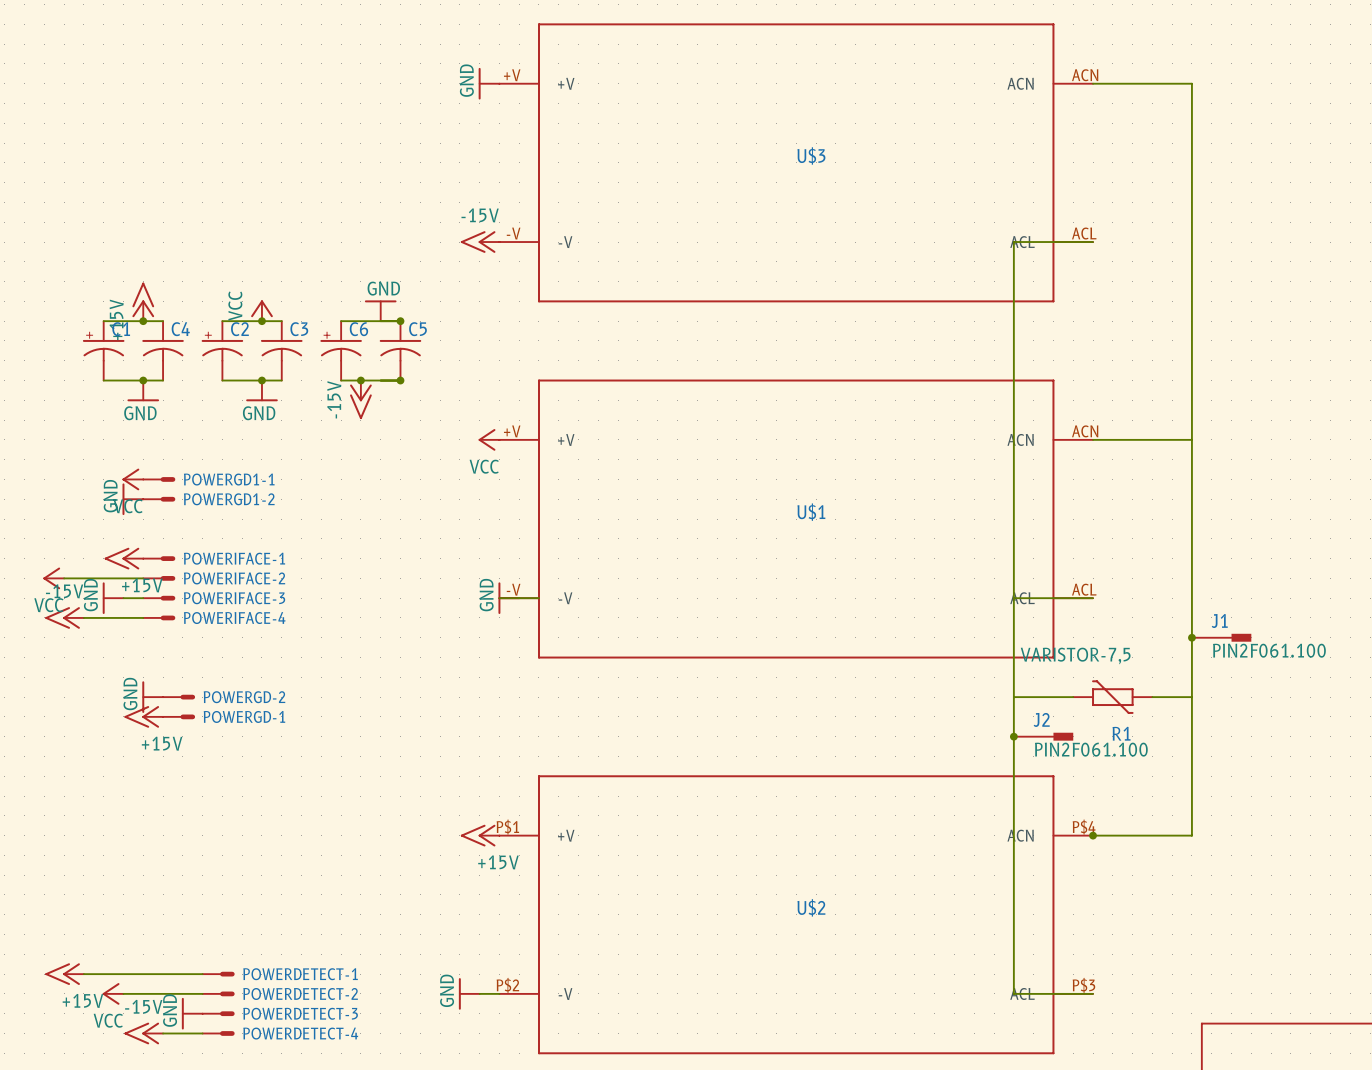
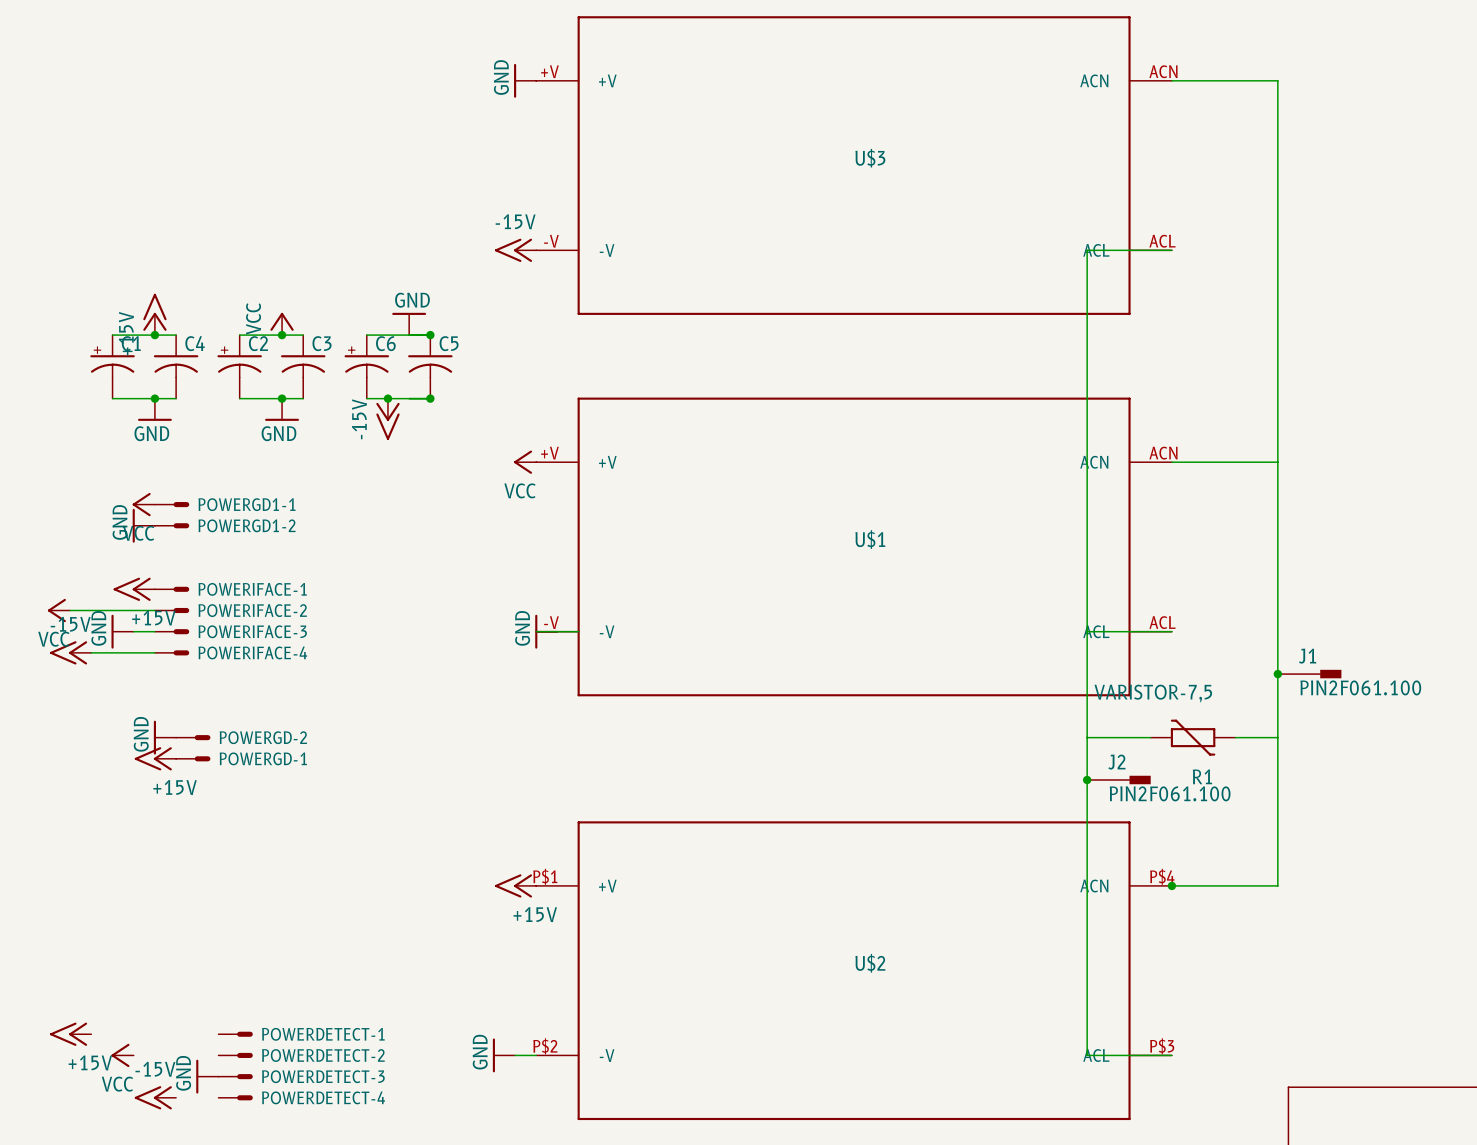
wire: (83, 974) (202, 974) -> none
wire: (123, 993) (202, 993) -> none
wire: (163, 1033) (202, 1033) -> none

